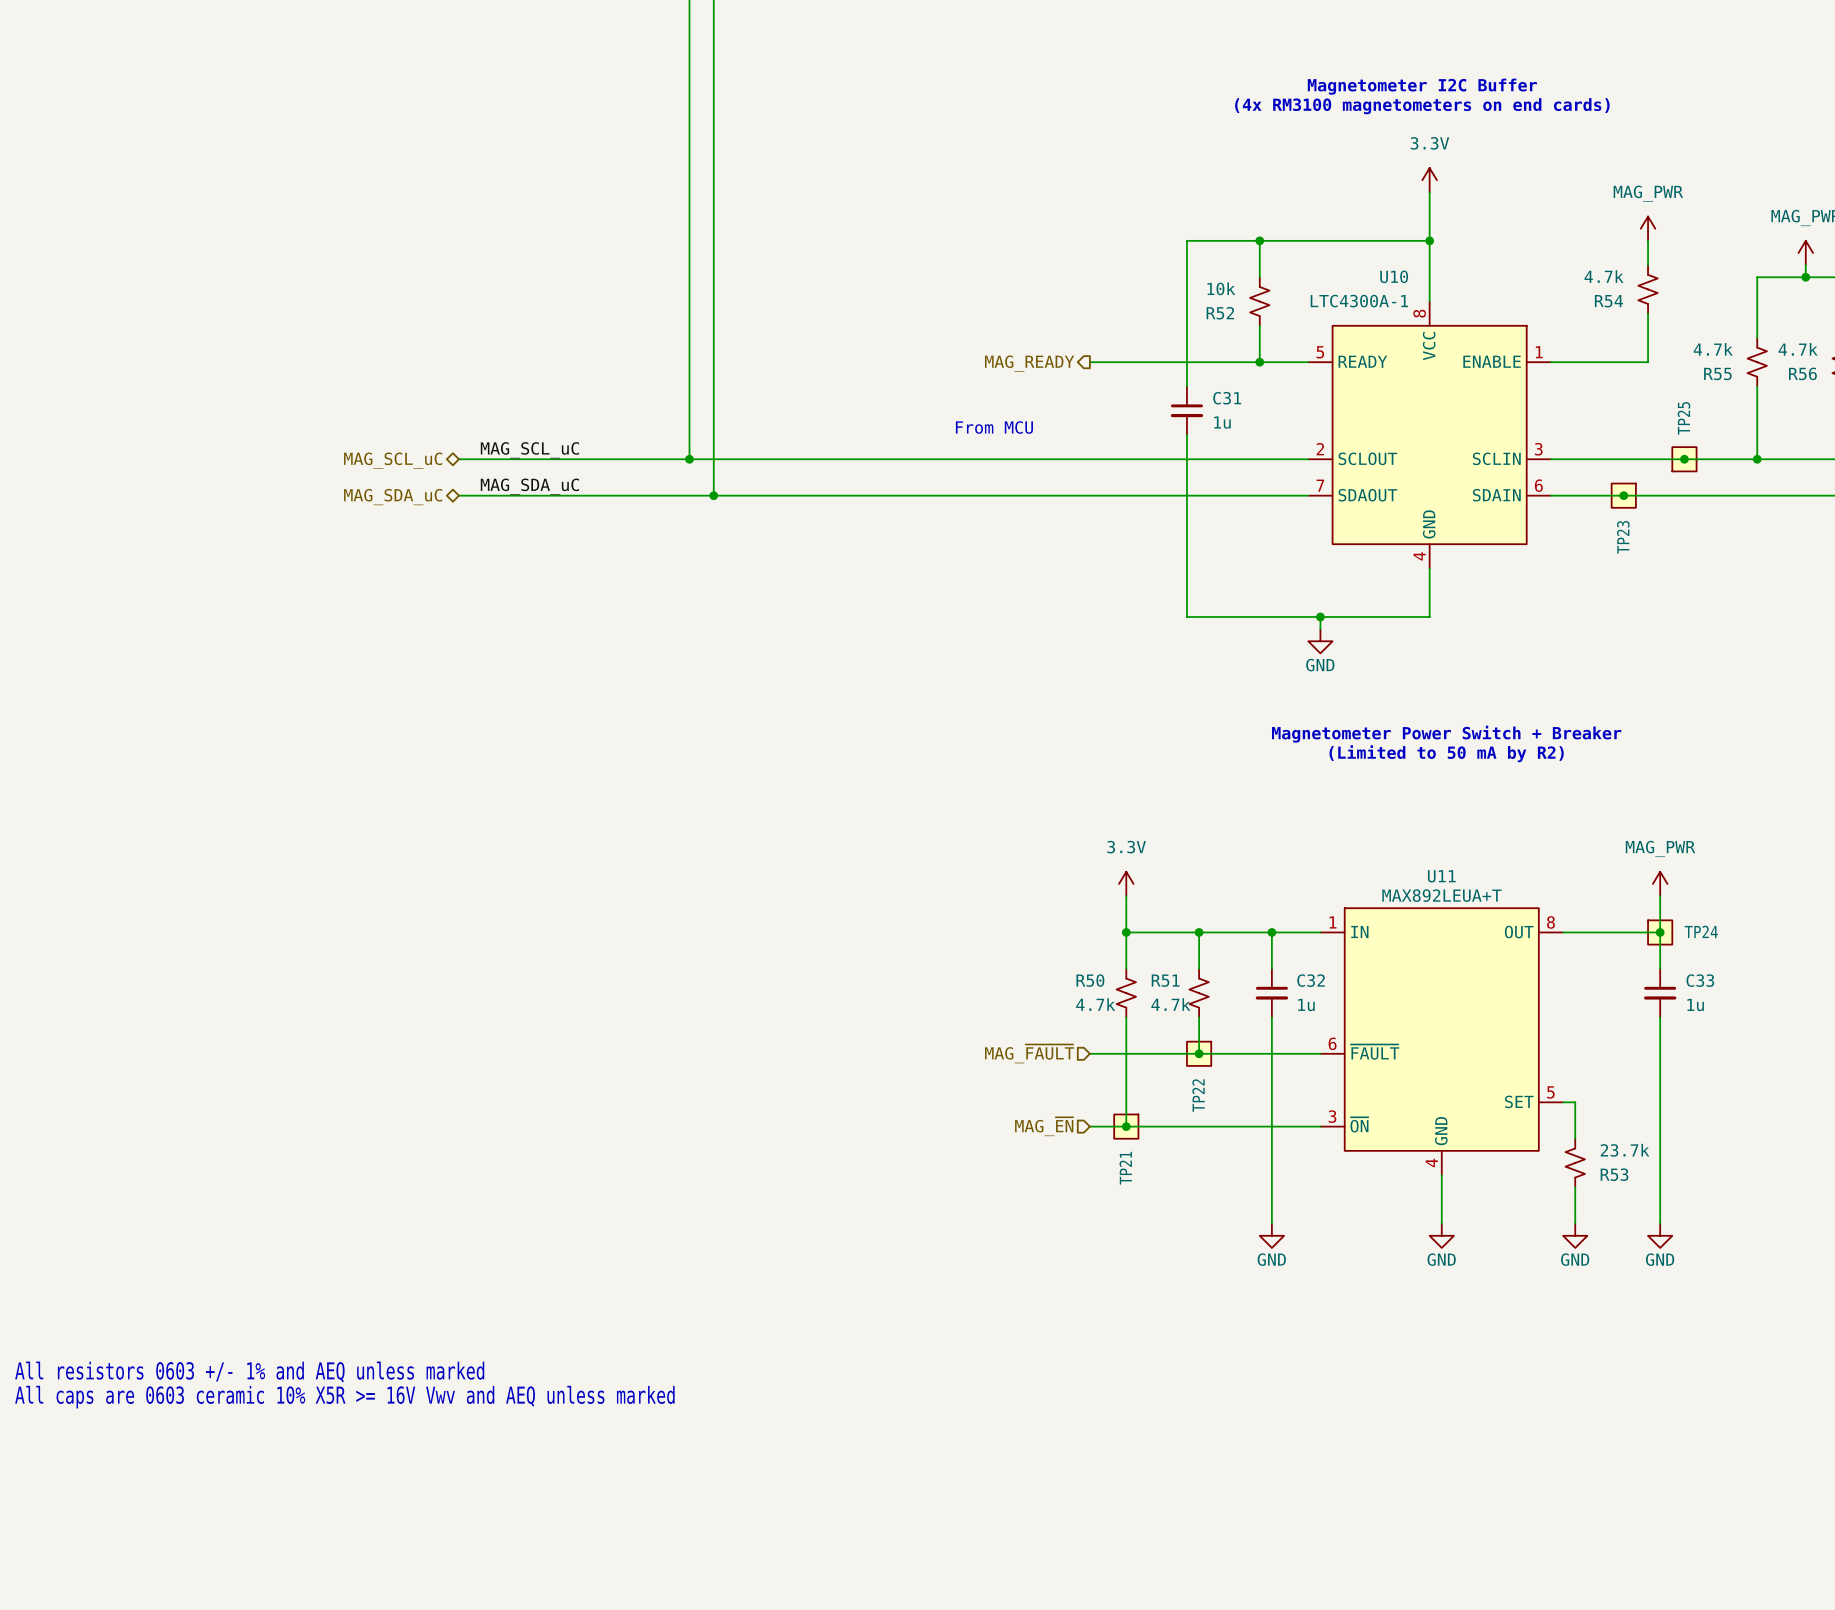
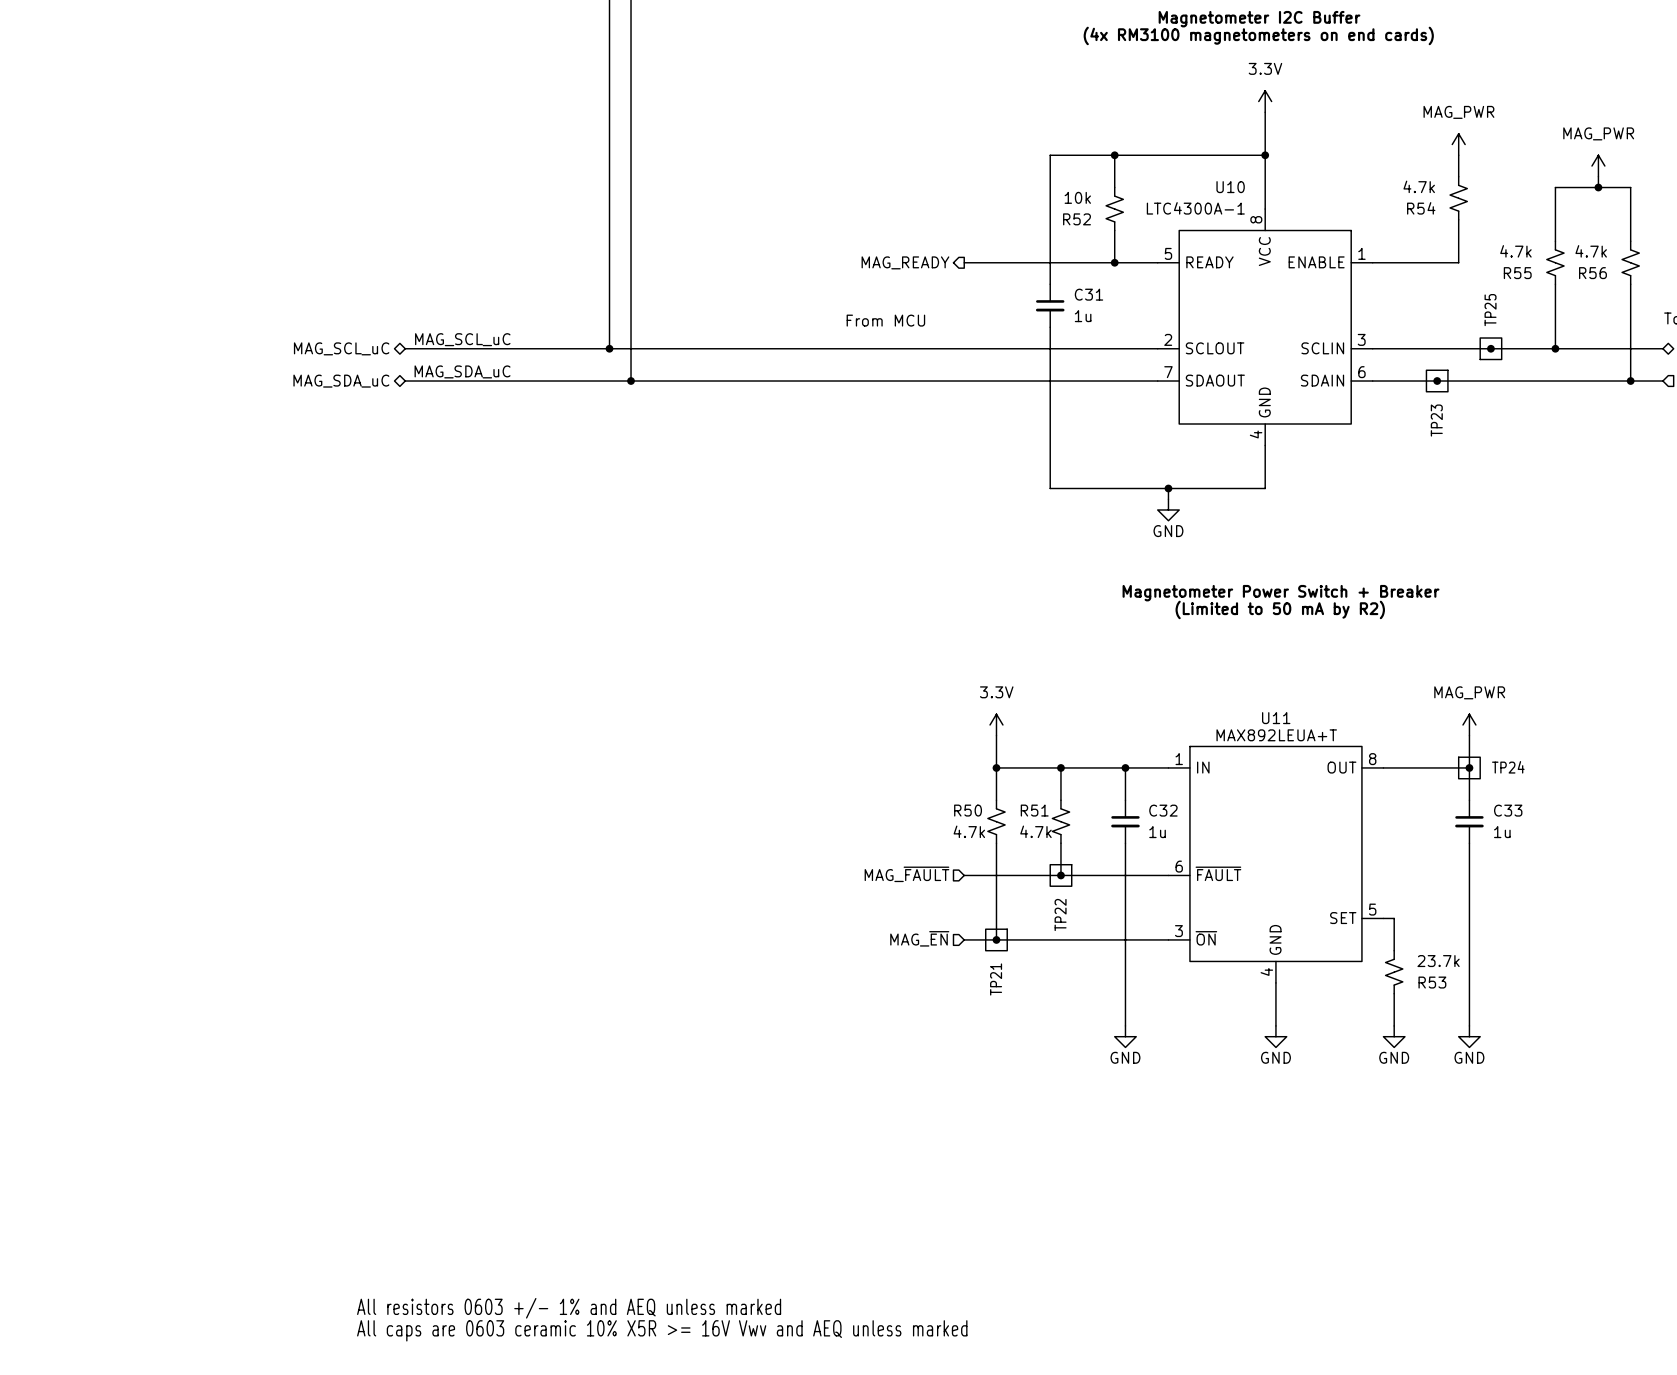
text: All resistors 0603 +/- 1% and AEQ unless marked (249, 1371) -> none
text: All caps are 0603 ceramic 10% X5R >= 16V Vwv and AEQ unless marked (344, 1397) -> none
text: none -> All resistors 0603 +/- 1% and AEQ unless marked (569, 1308)
text: none -> All caps are 0603 ceramic 10% X5R >= 16V Vwv and AEQ unless marked (662, 1330)

